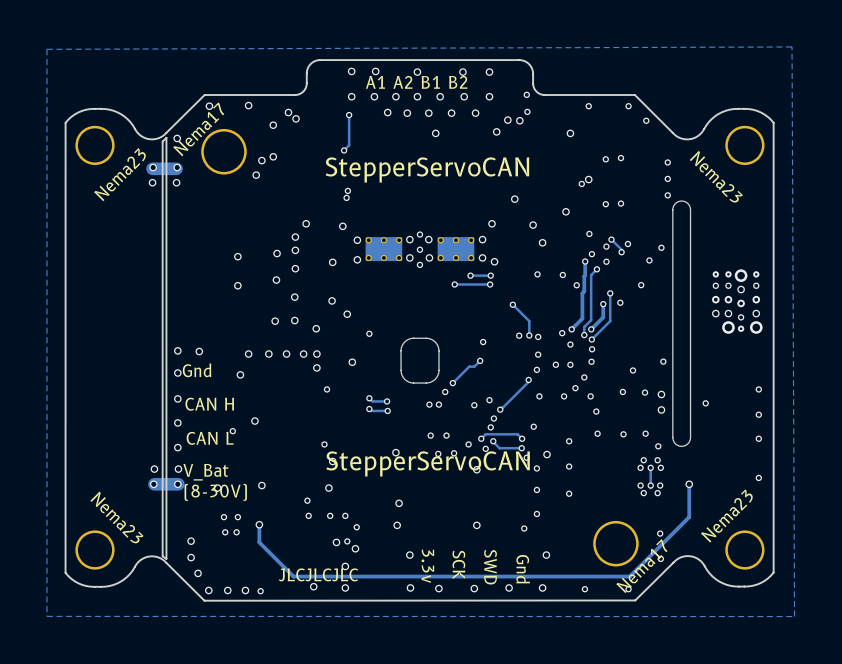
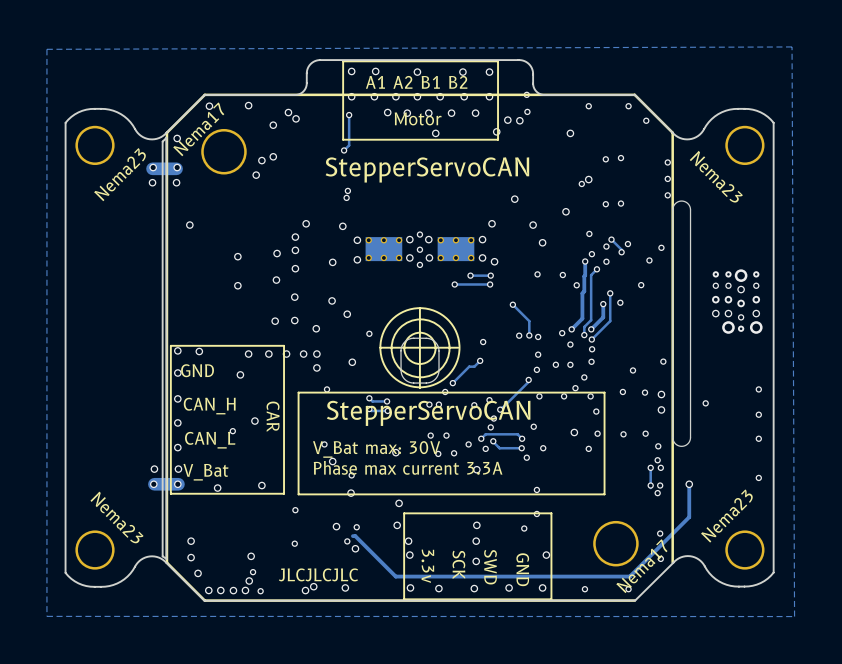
line: none -> (498, 61) (343, 61) (343, 139) (498, 139) (498, 61)
text: none -> Motor (418, 118)
via: none -> (189, 225)
drawing: none -> [379, 307, 461, 389]
line: none -> (419, 308) (419, 388)
line: none -> (284, 345) (284, 493) (170, 493) (170, 345) (284, 345)
line: none -> (457, 347) (380, 347)
text: Gnd (197, 370) -> GND (197, 370)
line: none -> (604, 392) (298, 392) (298, 494) (604, 494) (604, 392)
text: CAN H (209, 404) -> CAN_H (209, 406)
text: none -> CAR (273, 416)
text: CAN L (210, 438) -> CAN_L (210, 440)
via: (569, 441) -> none
via: none -> (543, 448)
via: none -> (588, 448)
text: none -> V_Bat max: 30V (376, 449)
via position: (547, 454) -> (574, 432)
via: (643, 460) -> none
text position: StepperServoCAN (428, 463) -> StepperServoCAN (428, 413)
via: (569, 466) -> none
text: none -> Phase max current 3.3A (408, 467)
via: (640, 467) -> none
via: (536, 468) -> none
via: none -> (351, 475)
via: (640, 485) -> none
via: (328, 488) -> none
text: (8-30V) (215, 492) -> none
via: none -> (351, 493)
via: (569, 493) -> none
via: (643, 493) -> none
via: (307, 500) -> none
via: none -> (295, 510)
line: none -> (551, 513) (404, 513) (404, 599) (551, 599) (551, 513)
via: (308, 515) -> none
via: (330, 515) -> none
via: (345, 515) -> none
via: (223, 517) -> none
via: (237, 517) -> none
track: (259, 524) (259, 542) (293, 576) (395, 576) -> (352, 536) (355, 536) (395, 576)
via: (259, 524) -> none
via: (225, 532) -> none
via: (236, 532) -> none
via: none -> (408, 541)
via: none -> (476, 541)
via position: (336, 542) -> (336, 526)
via: none -> (294, 543)
via: none -> (251, 556)
via: none -> (476, 561)
line: none -> (672, 562) (672, 132) (634, 94) (204, 94) (166, 132) (166, 562) (204, 600) (634, 600)
via: (345, 566) -> none
text: Gnd (523, 569) -> GND (522, 569)
via: none -> (253, 572)
via: none -> (249, 580)
via: none -> (220, 590)
via: (227, 590) -> none
via: none -> (233, 590)
via: none -> (305, 590)

